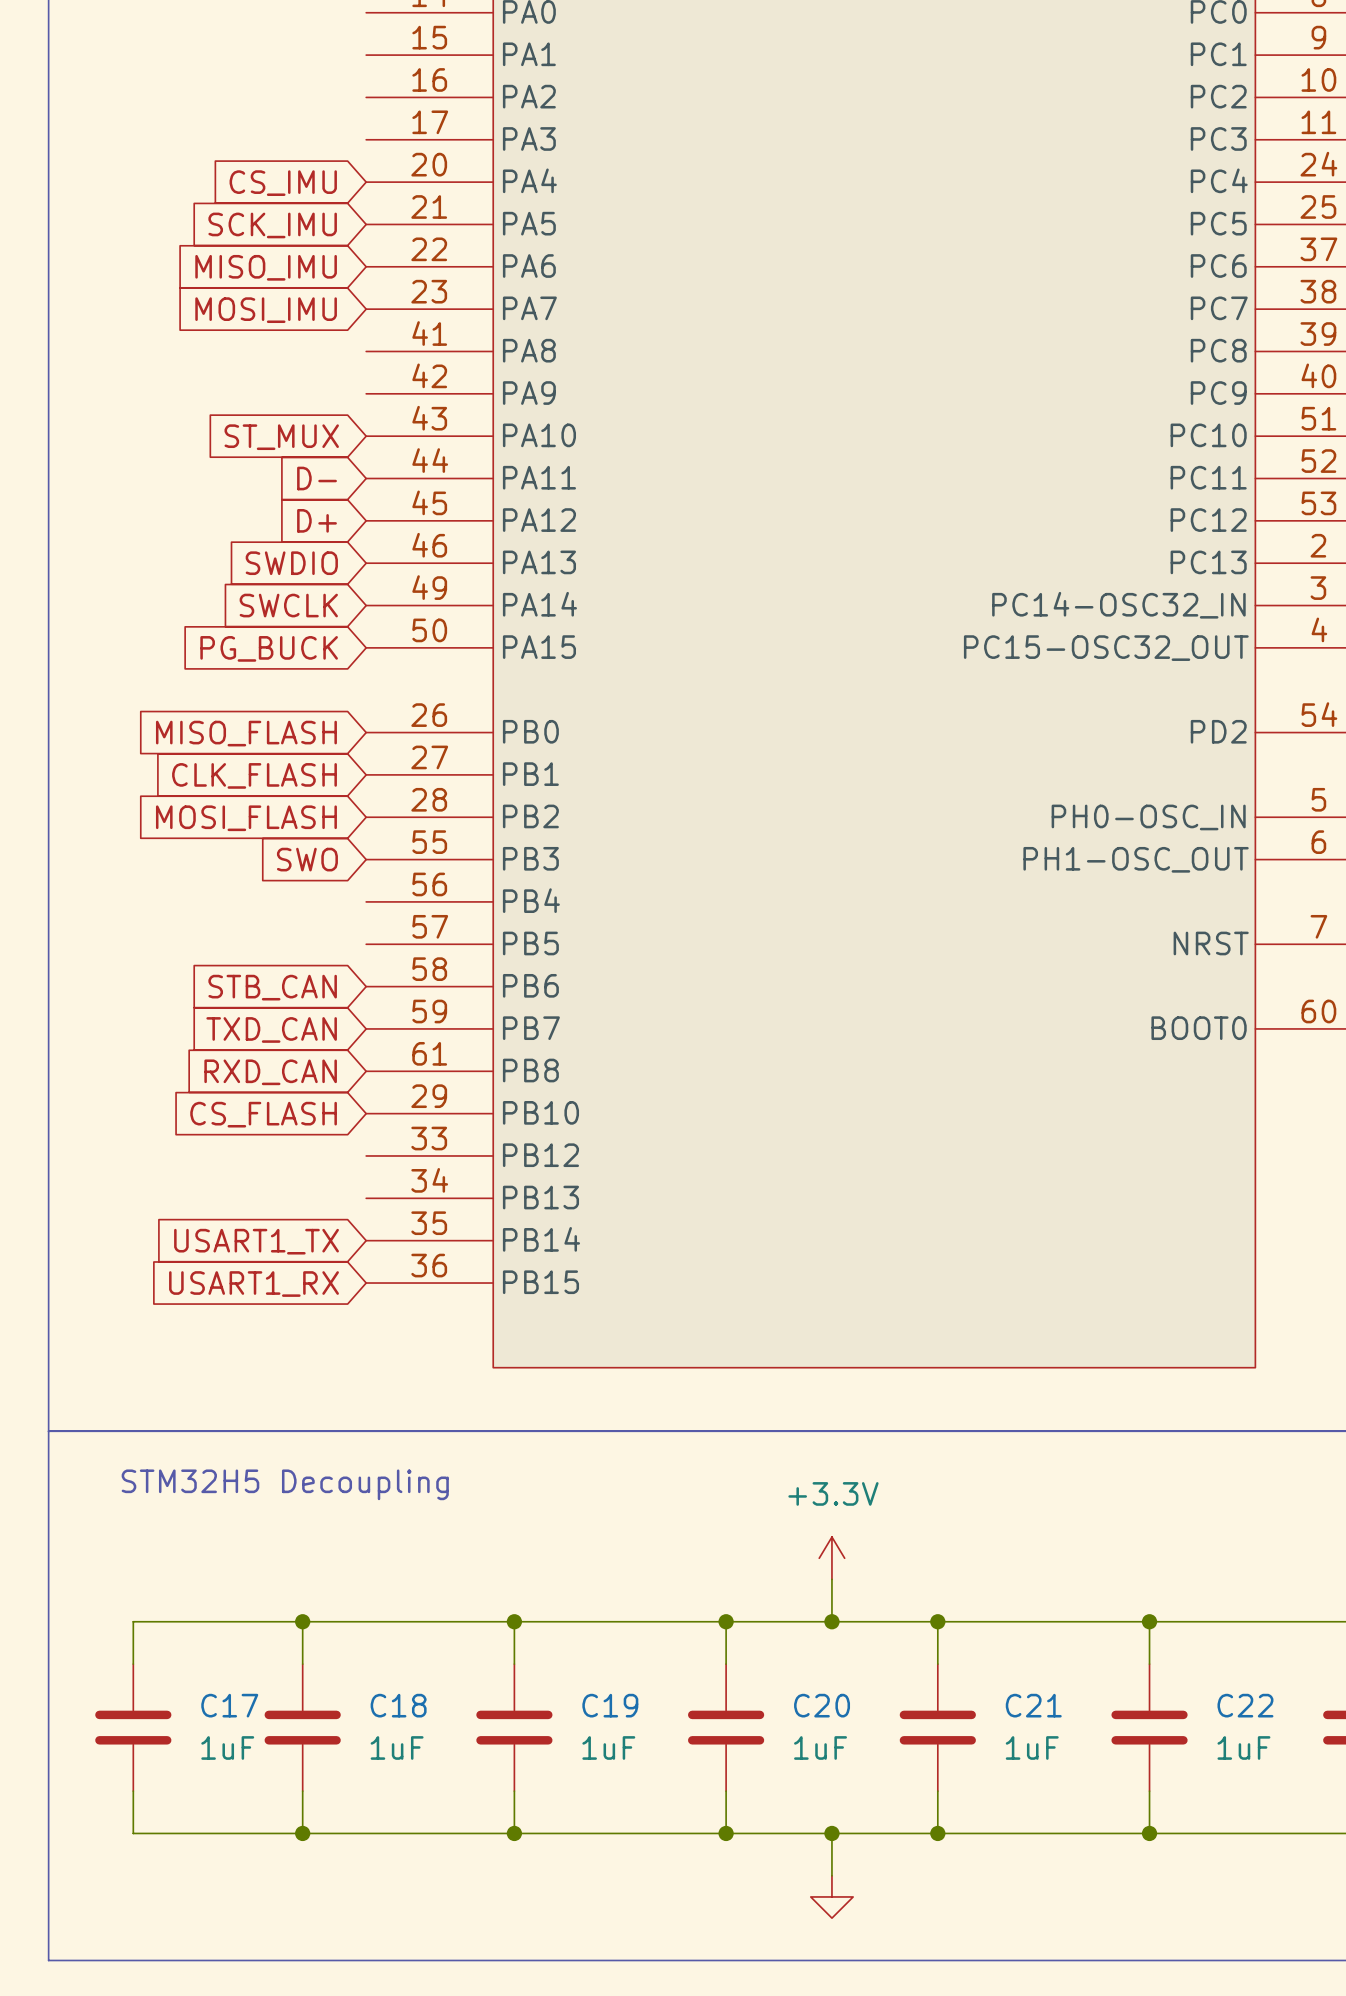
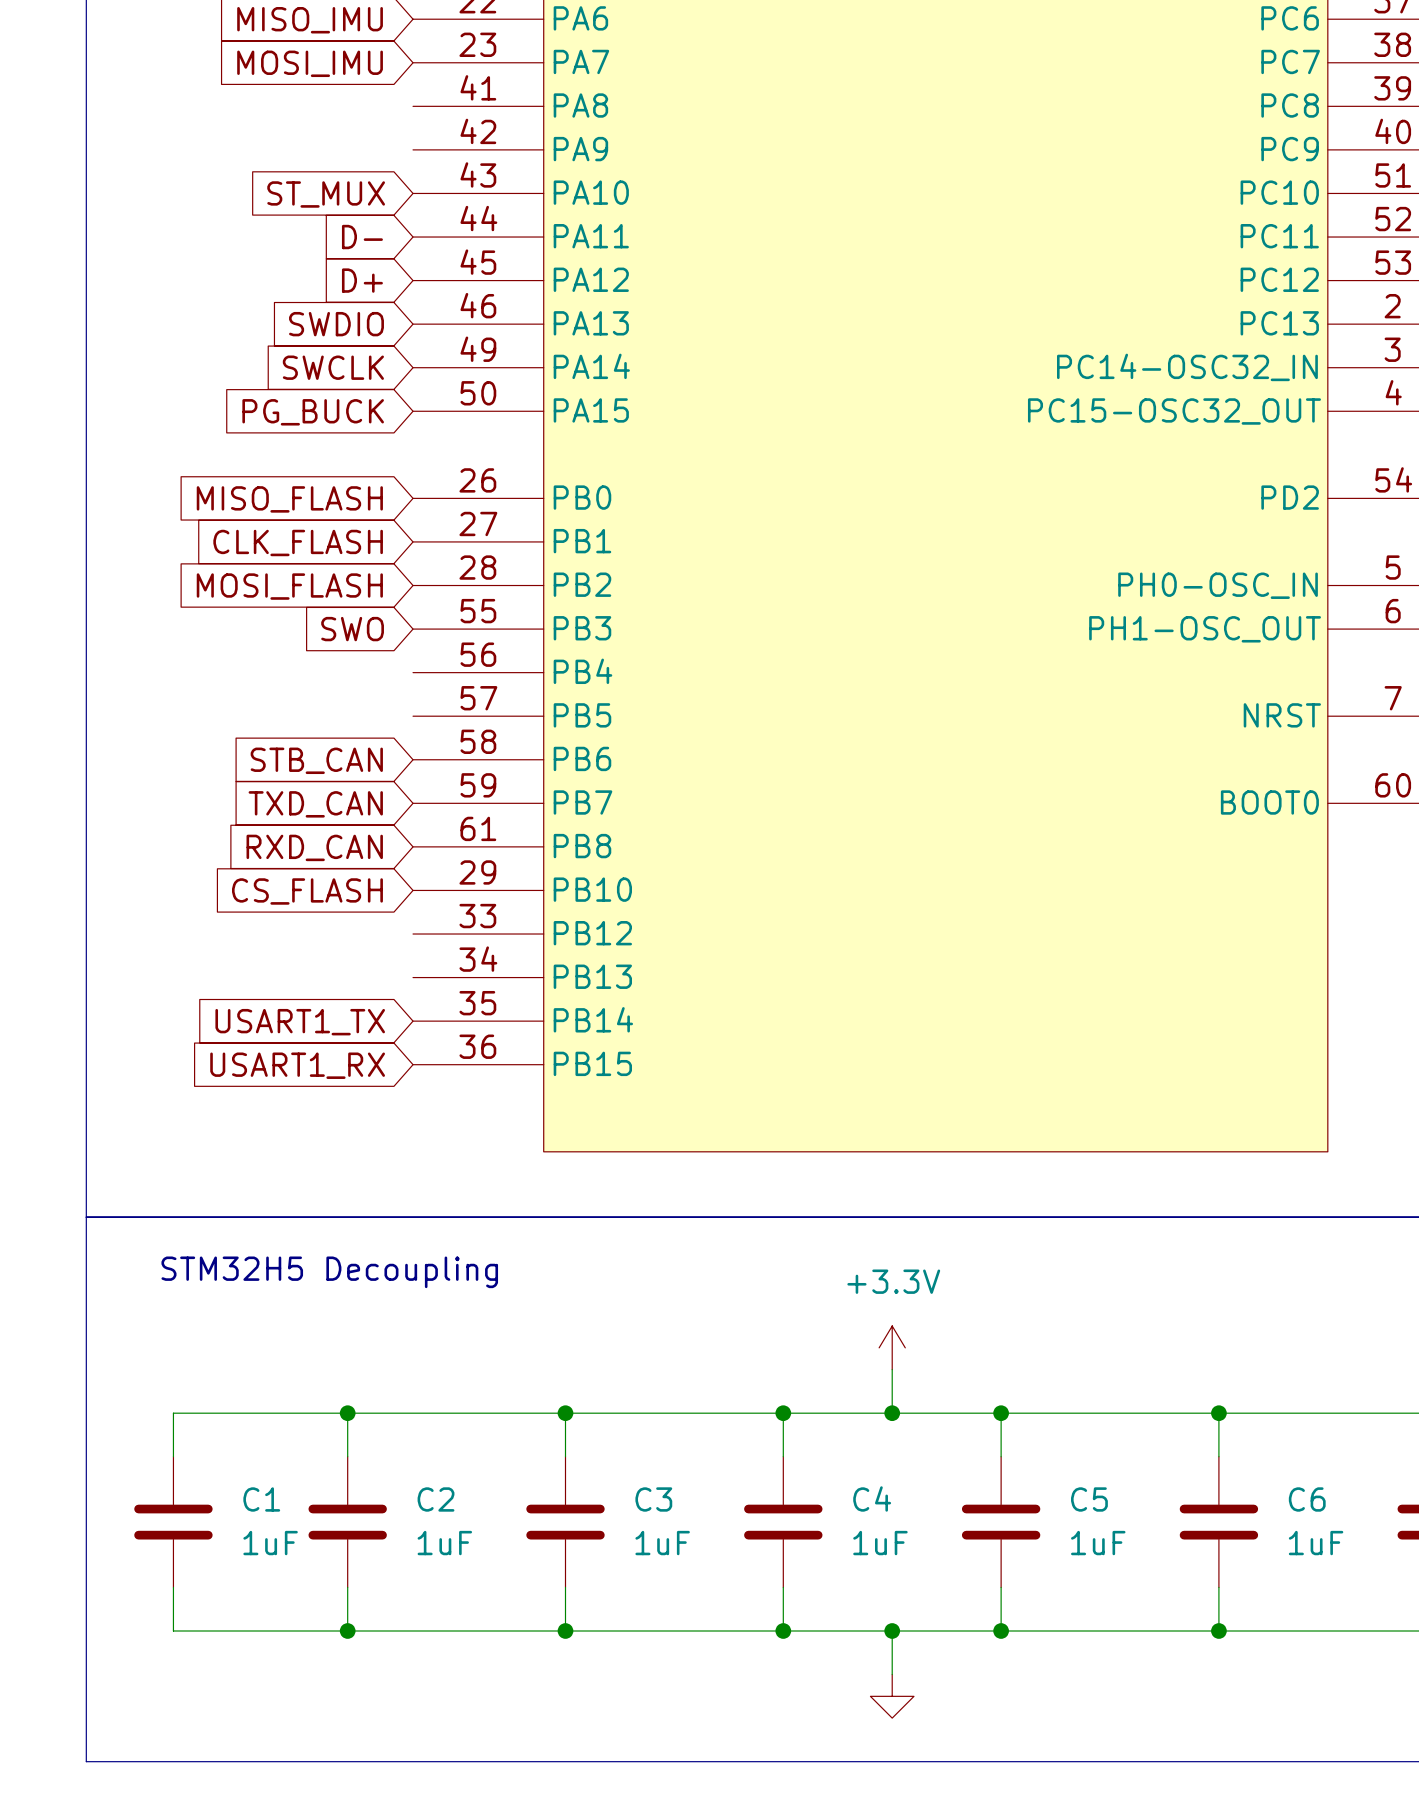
C17 name: C17 (229, 1705) -> C1 (261, 1499)
C18 name: C18 (398, 1705) -> C2 (436, 1499)
C19 name: C19 (610, 1705) -> C3 (653, 1499)
C20 name: C20 (822, 1705) -> C4 (872, 1498)
C21 name: C21 (1033, 1705) -> C5 (1089, 1499)
C22 name: C22 (1245, 1705) -> C6 (1307, 1499)

